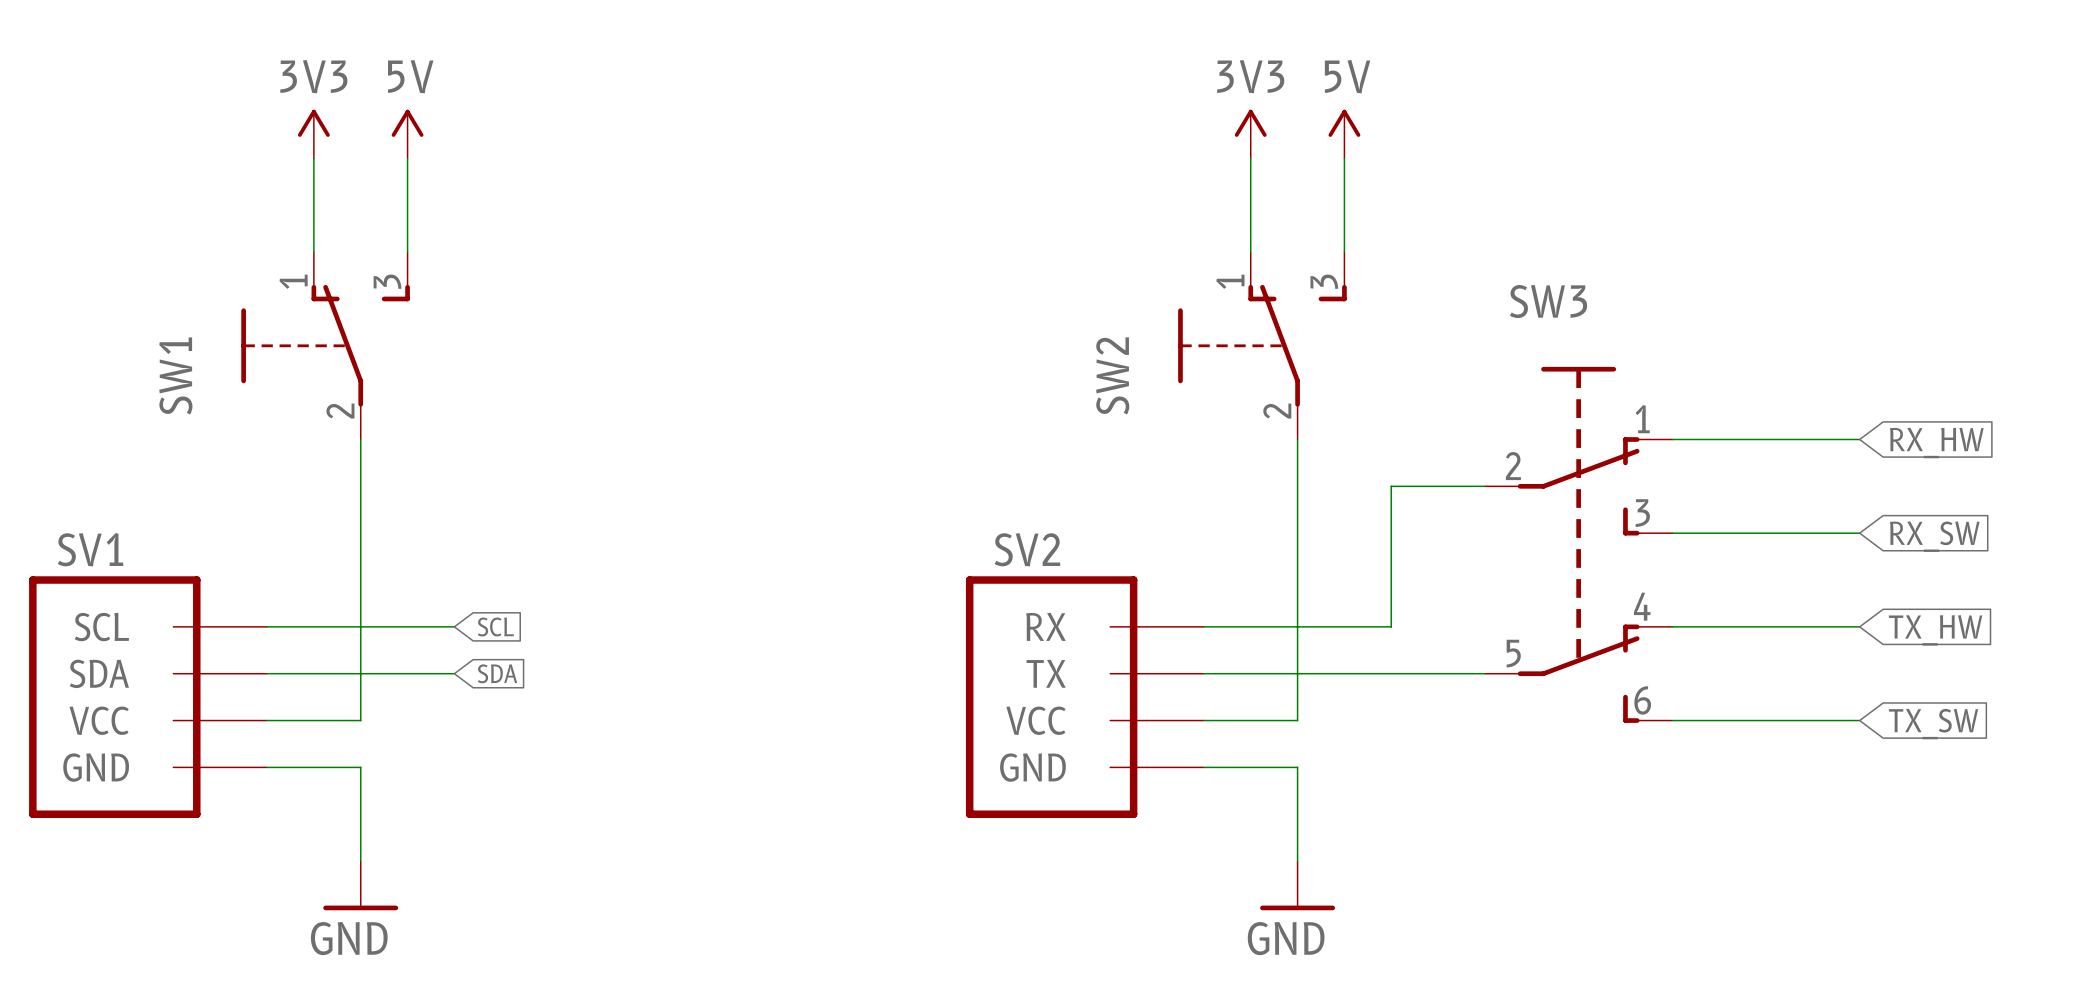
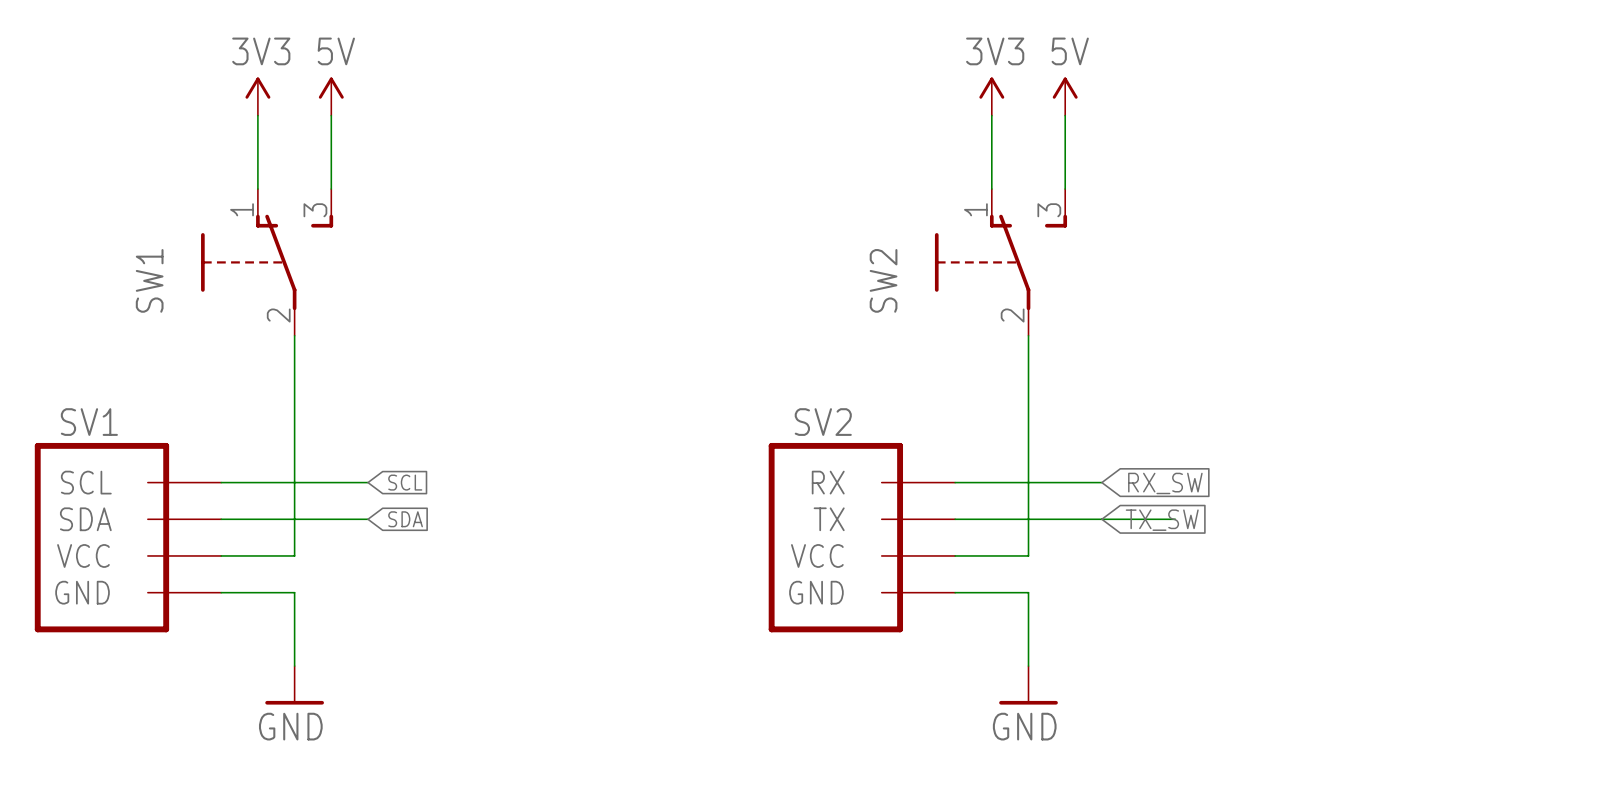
wire: (1672, 439) (1859, 439) -> none
global label: RX_HW (1936, 443) -> none
wire: (1484, 486) (1391, 486) (1391, 626) -> none
wire: (1672, 533) (1859, 533) -> none
global label: RX_SW (1934, 536) -> none
SW3: (1578, 544) -> none
wire: (1672, 626) (1859, 626) -> none
global label: none -> RX_SW (1165, 483)
global label: TX_HW (1935, 630) -> none
global label: none -> TX_SW (1162, 520)
wire: (1672, 720) (1859, 720) -> none
global label: TX_SW (1933, 724) -> none

